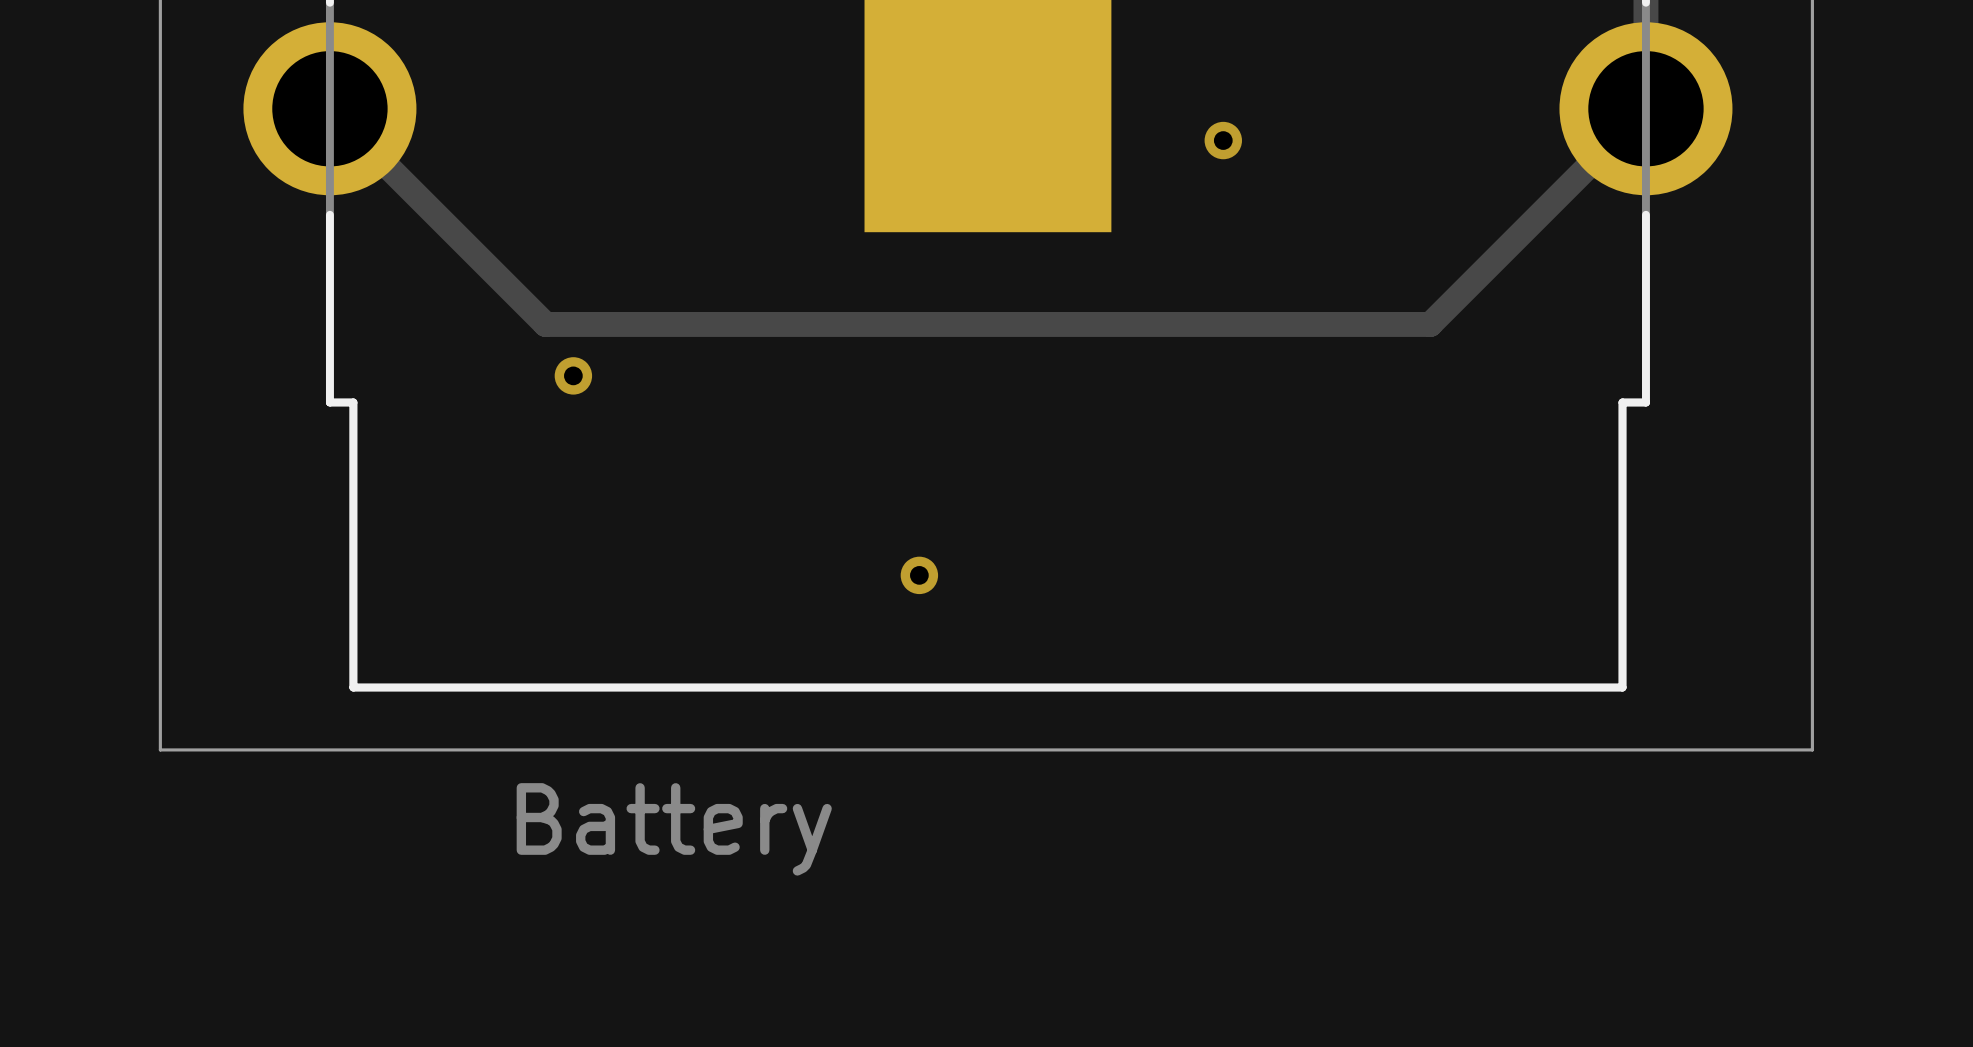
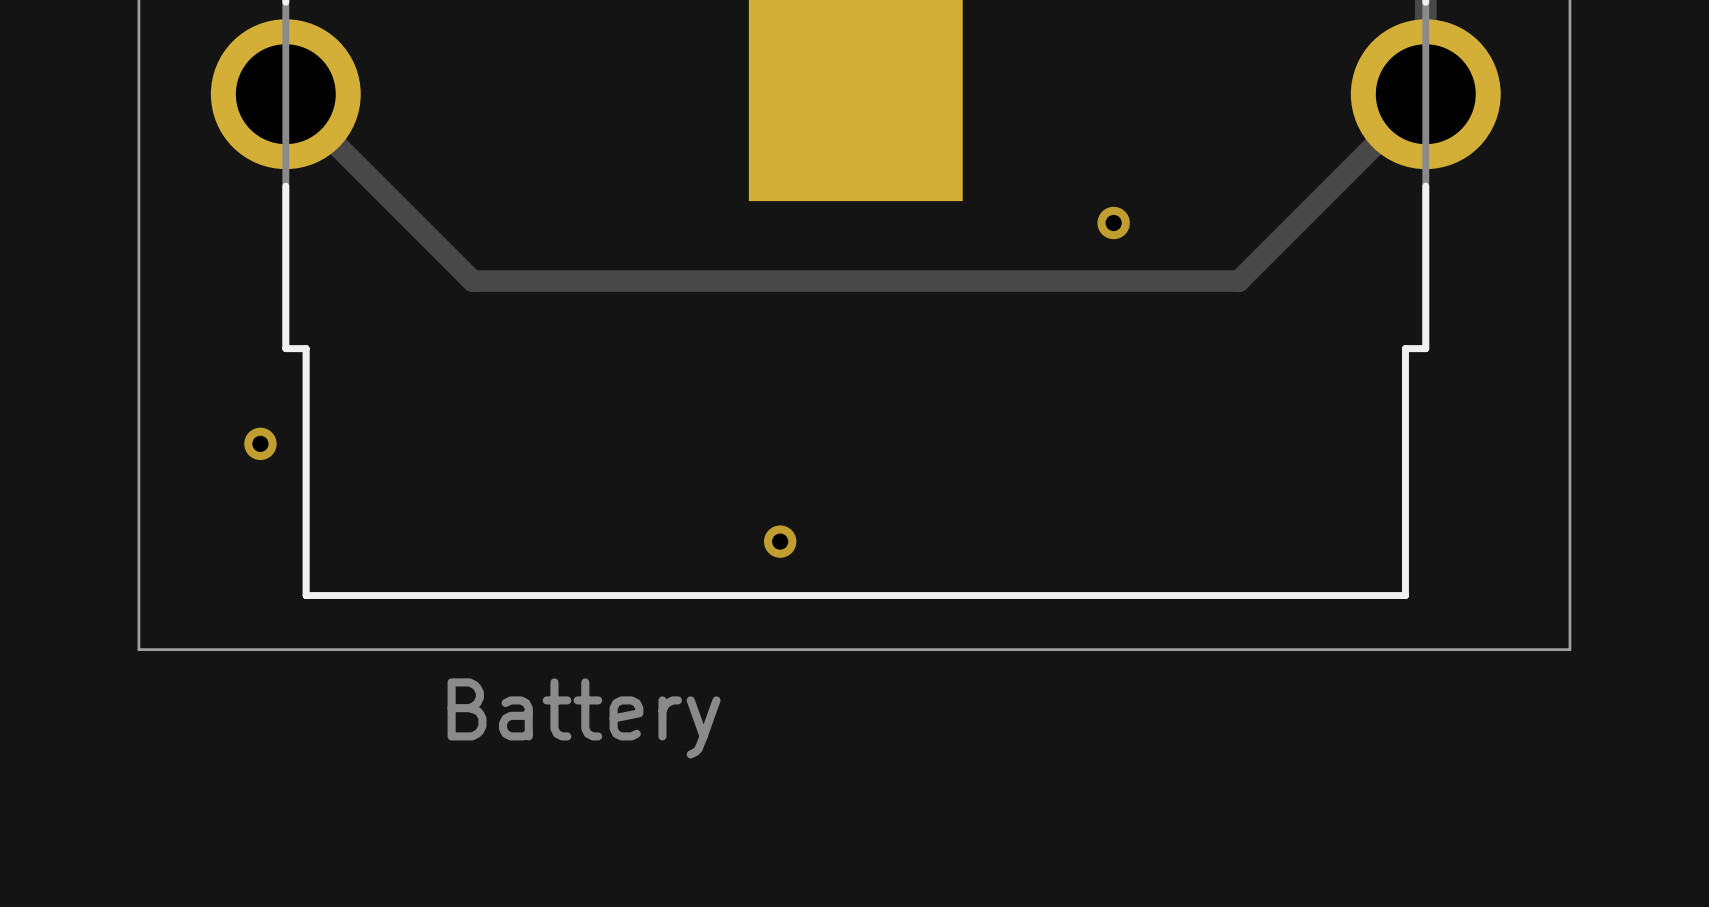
via position: (1223, 140) -> (1113, 223)
via: (573, 375) -> none
via: none -> (260, 443)
via position: (919, 575) -> (780, 541)

